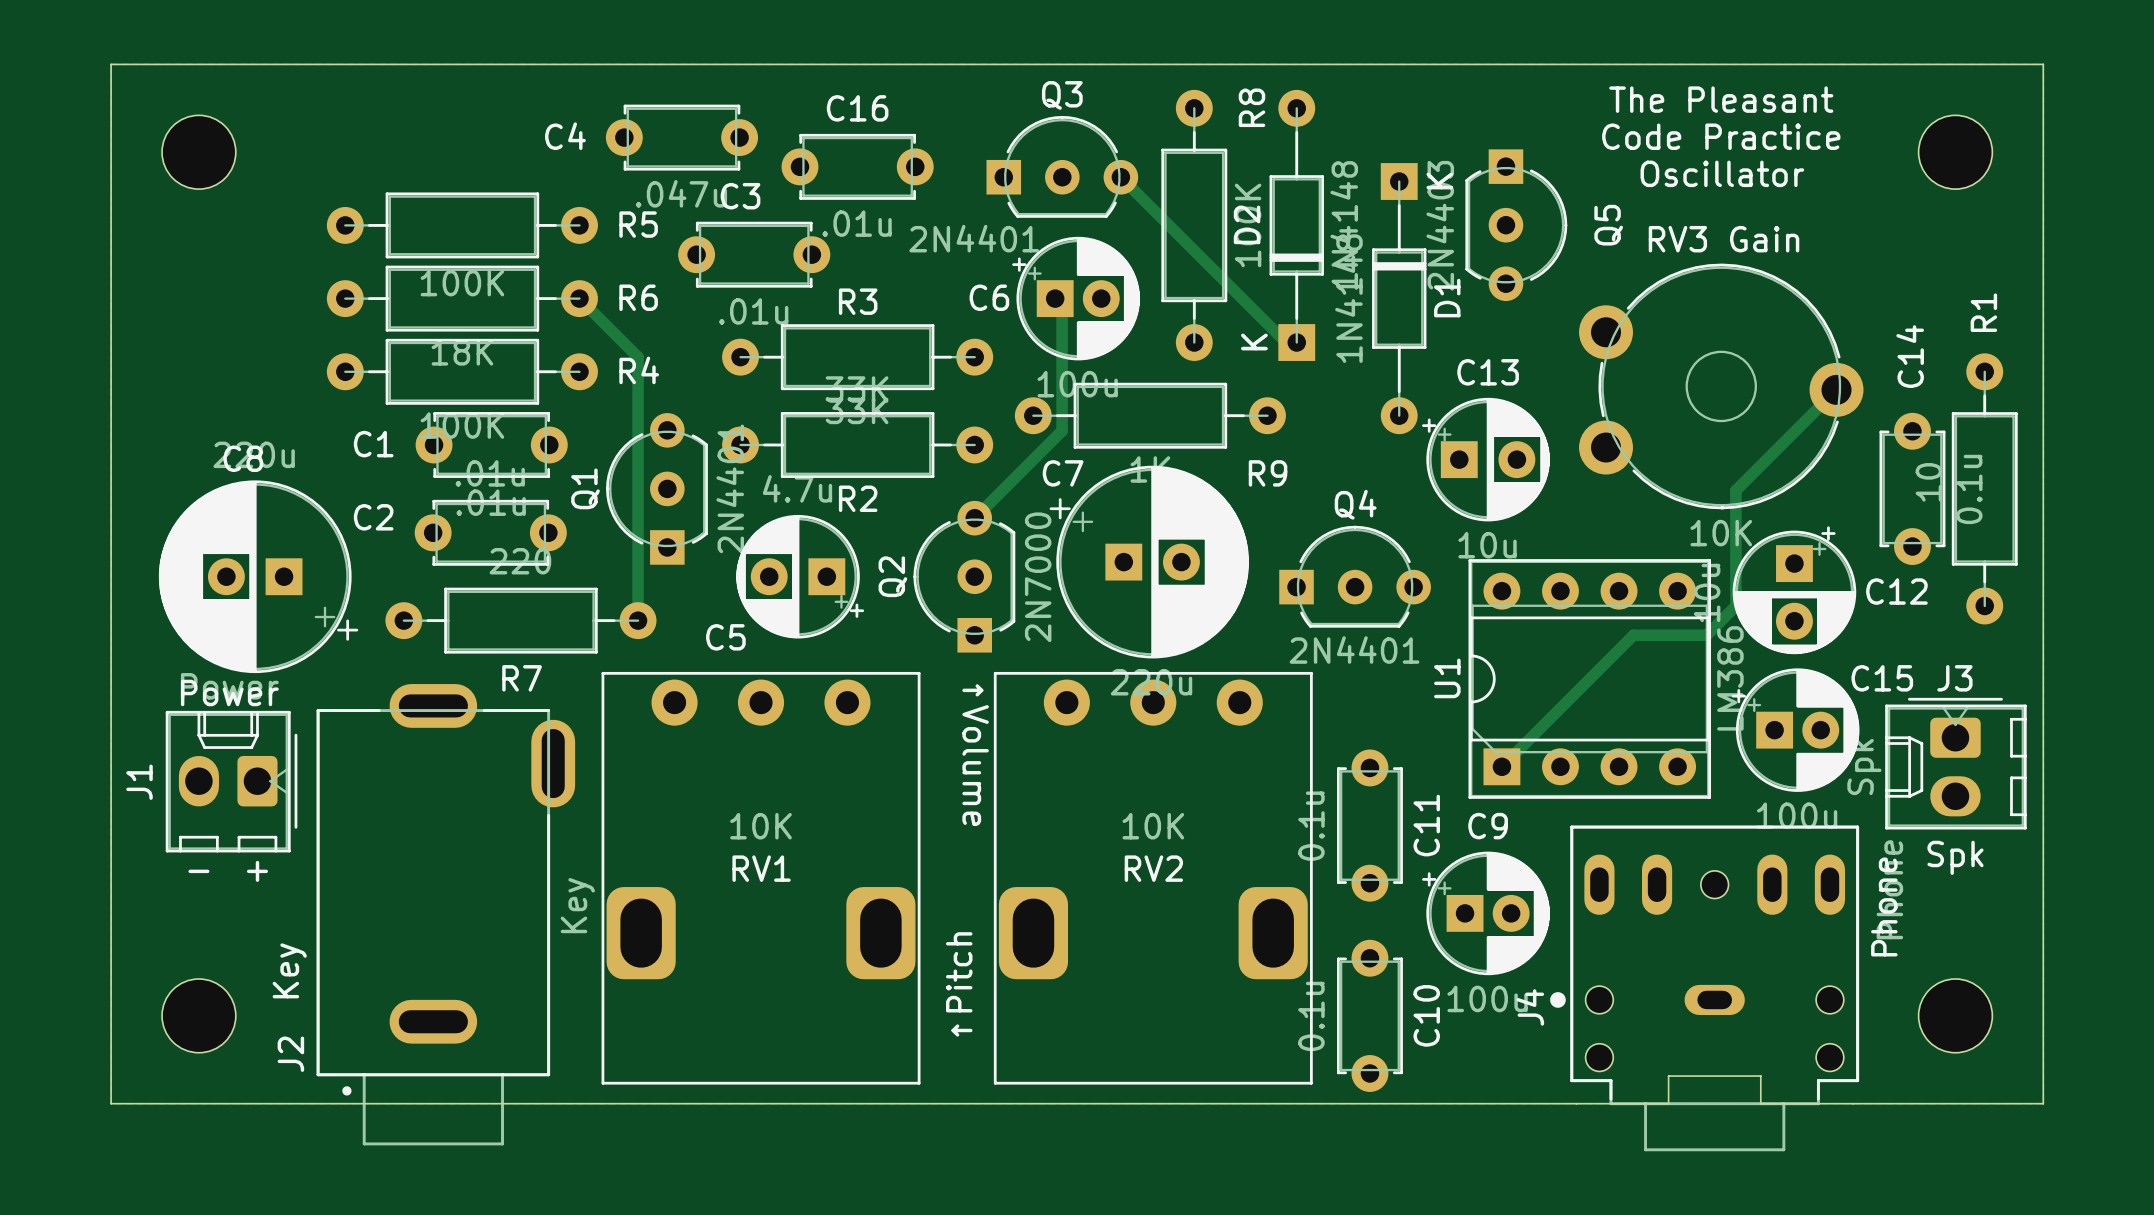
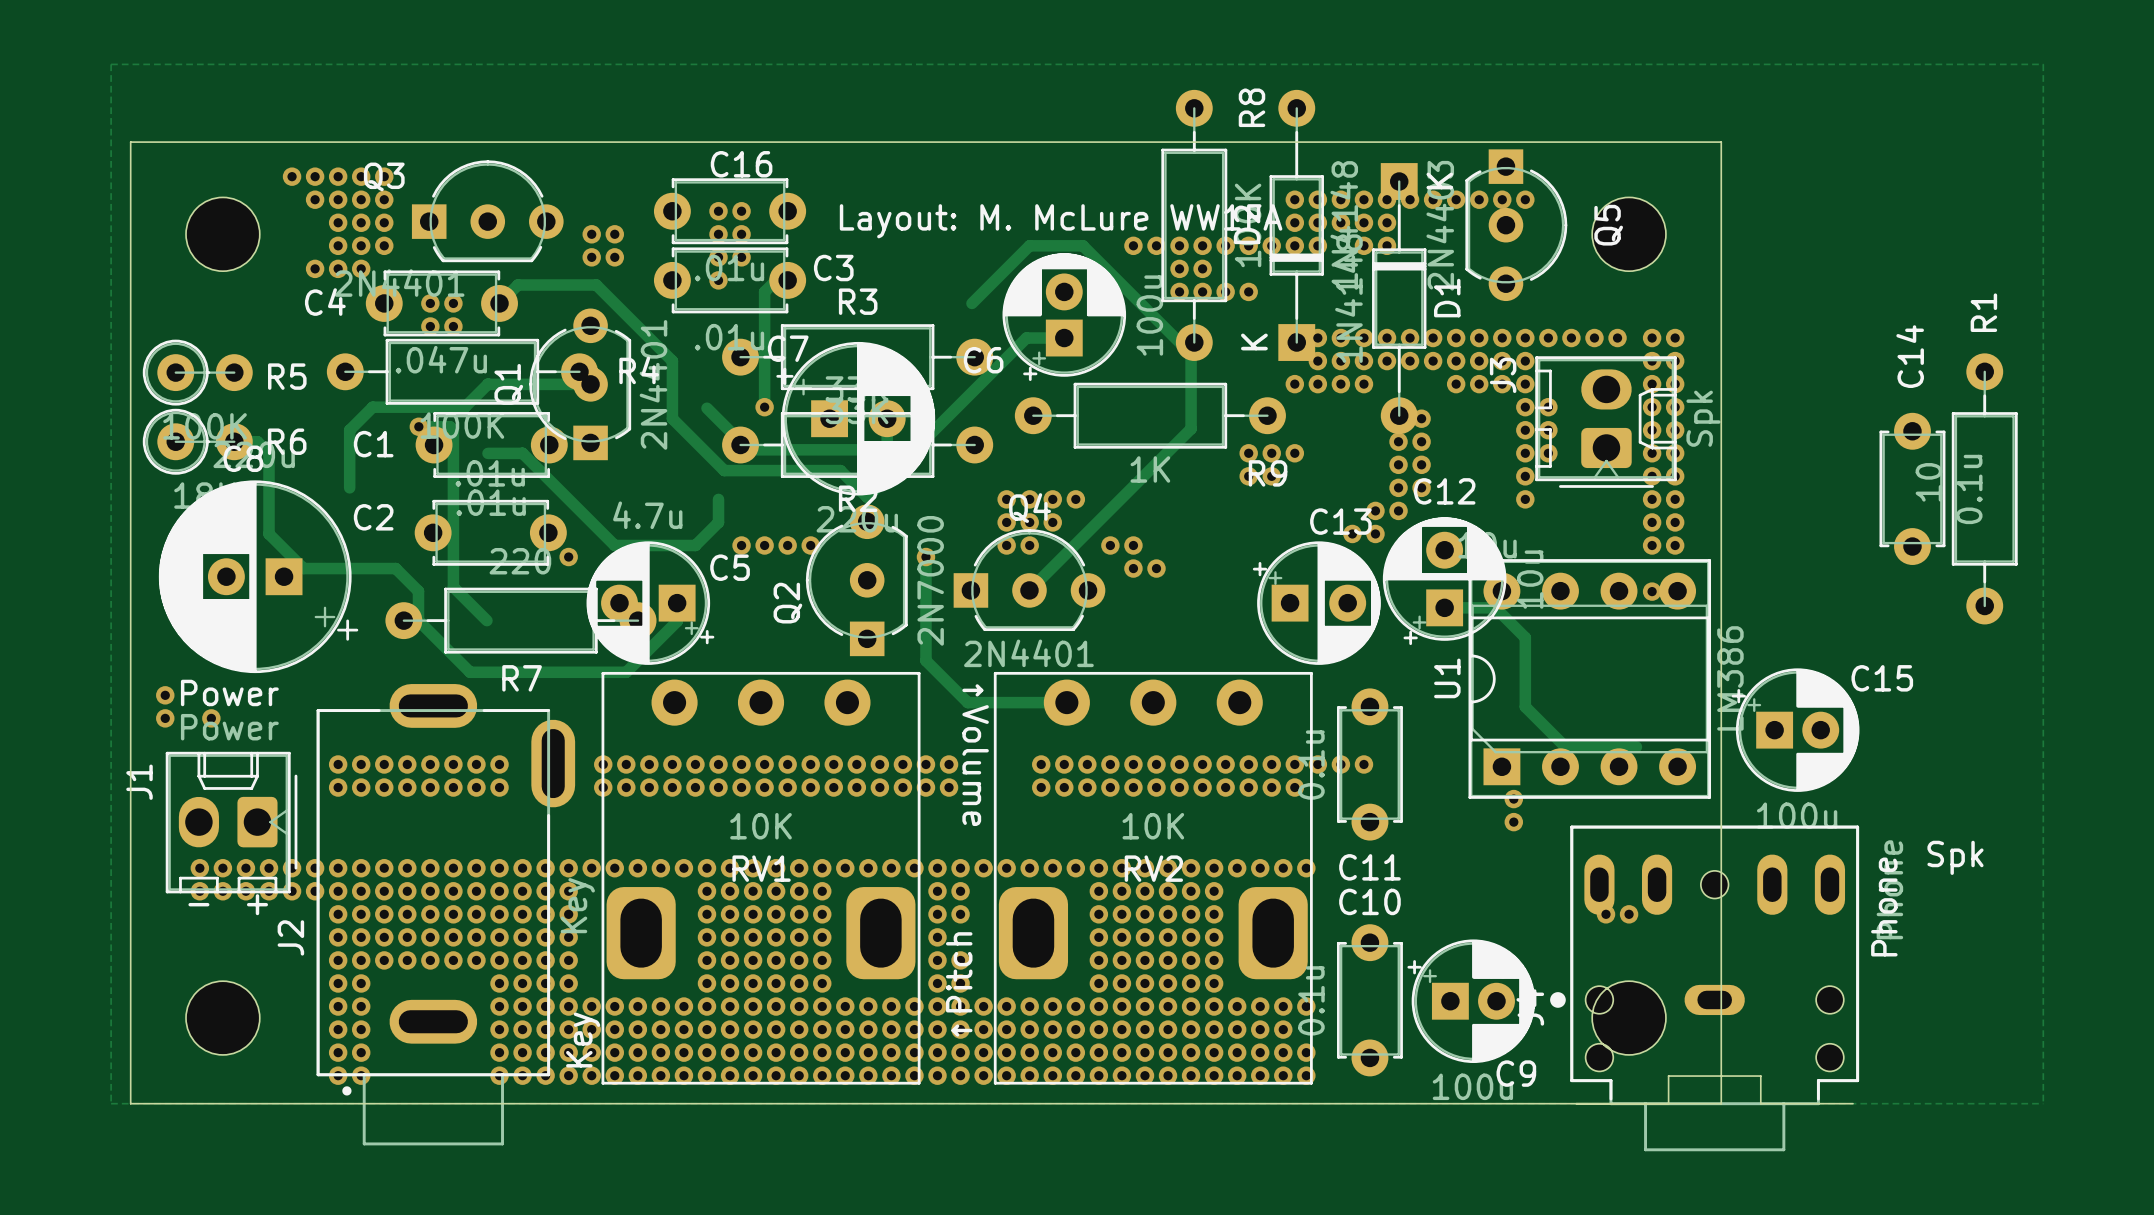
Q3 name position: Q3 (1062, 95) -> Q3 (384, 176)
text: The Pleasant (1721, 99) -> none
C16 name position: C16 (857, 108) -> C16 (741, 164)
text: Code Practice (1721, 136) -> none
C4 position: (681, 137) -> (441, 303)
part position: (198, 152) -> (222, 234)
part position: (1955, 152) -> (1629, 234)
C16 position: (857, 166) -> (730, 211)
Q3 position: (1062, 166) -> (487, 211)
text: Oscillator (1722, 173) -> none
via: none -> (292, 176)
via: none -> (315, 176)
via: none -> (338, 176)
via: none -> (361, 176)
via: none -> (384, 176)
track: (1120, 177) (1286, 342) (1296, 342) -> none
R5 footprint: [326, 192, 598, 259] -> [142, 339, 253, 406]
C3 name position: C3 (740, 196) -> C3 (833, 268)
via: none -> (315, 199)
via: none -> (338, 199)
via: none -> (361, 199)
via: none -> (384, 199)
via: none -> (1294, 199)
via: none -> (1317, 199)
via: none -> (1340, 199)
via: none -> (1363, 199)
via: none -> (1387, 199)
via: none -> (1410, 199)
via: none -> (1433, 199)
via: none -> (1456, 199)
via: none -> (1479, 199)
via: none -> (1502, 199)
via: none -> (1525, 199)
via: none -> (718, 211)
via: none -> (741, 211)
text: none -> Layout: M. McLure WW1FA (1061, 221)
via: none -> (338, 222)
via: none -> (361, 222)
via: none -> (384, 222)
via: none -> (1294, 222)
via: none -> (1317, 222)
via: none -> (1340, 222)
via: none -> (1363, 222)
via: none -> (1387, 222)
R5 name position: R5 (638, 224) -> R5 (287, 376)
via: none -> (591, 234)
via: none -> (614, 234)
via: none -> (718, 234)
via: none -> (741, 234)
text: Gain (1764, 239) -> none
via: none -> (338, 245)
via: none -> (361, 245)
via: none -> (384, 245)
via: none -> (1133, 245)
via: none -> (1156, 245)
via: none -> (1179, 245)
via: none -> (1202, 245)
via: none -> (1225, 245)
via: none -> (1248, 245)
via: none -> (1271, 245)
via: none -> (1294, 245)
via: none -> (1317, 245)
via: none -> (1363, 245)
via: none -> (1387, 245)
C3 position: (754, 254) -> (730, 280)
via: none -> (591, 257)
via: none -> (614, 257)
via: none -> (718, 257)
via: none -> (741, 257)
R6 footprint: [326, 265, 598, 332] -> [142, 408, 253, 475]
via: none -> (315, 268)
via: none -> (338, 268)
via: none -> (361, 268)
via: none -> (1179, 268)
via: none -> (1202, 268)
via: none -> (718, 280)
track: none -> (776, 280) (764, 291) (764, 407)
via: none -> (1179, 291)
via: none -> (1202, 291)
via: none -> (1225, 291)
via: none -> (1248, 291)
R6 name position: R6 (638, 297) -> R6 (287, 441)
track: (579, 298) (638, 357) (638, 620) -> none
track: (1055, 298) (1062, 305) (1062, 430) (974, 518) -> none
C6 rotation: 0° (1076, 298) -> 90° counterclockwise (1064, 317)
via: none -> (430, 303)
via: none -> (453, 303)
track: none -> (499, 303) (517, 285) (596, 285) (672, 361) (672, 418) (724, 470) (840, 470) (867, 497) (1026, 338) (1064, 338)
track: none -> (971, 303) (1029, 245) (1082, 245) (1191, 353) (1191, 428) (1029, 590)
via: none -> (430, 326)
via: none -> (453, 326)
via: none -> (1317, 338)
via: none -> (1340, 338)
via: none -> (1363, 338)
via: none -> (1387, 338)
via: none -> (1410, 338)
via: none -> (1433, 338)
via: none -> (1456, 338)
via: none -> (1479, 338)
via: none -> (1502, 338)
via: none -> (1525, 338)
via: none -> (1548, 338)
via: none -> (1571, 338)
via: none -> (1594, 338)
via: none -> (1617, 338)
via: none -> (1652, 338)
via: none -> (1675, 338)
via: none -> (1317, 361)
via: none -> (1340, 361)
via: none -> (1363, 361)
via: none -> (1387, 361)
via: none -> (1410, 361)
via: none -> (1433, 361)
via: none -> (1456, 361)
via: none -> (1479, 361)
via: none -> (1502, 361)
via: none -> (1525, 361)
via: none -> (1652, 361)
via: none -> (1675, 361)
C13 name position: C13 (1488, 372) -> C13 (1340, 521)
track: none -> (487, 384) (464, 407) (372, 407) (349, 430) (349, 487)
track: none -> (488, 384) (590, 384)
via: none -> (1294, 384)
via: none -> (1317, 384)
via: none -> (1340, 384)
via: none -> (1363, 384)
via: none -> (1456, 384)
via: none -> (1479, 384)
via: none -> (1502, 384)
via: none -> (1525, 384)
via: none -> (1652, 384)
via: none -> (1675, 384)
RV3: 10K (1721, 386) -> none
track: (1836, 389) (1735, 490) (1735, 606) (1706, 635) (1633, 635) (1501, 766) -> none
via: none -> (764, 407)
via: none -> (1525, 407)
via: none -> (1548, 407)
via: none -> (1652, 407)
via: none -> (1675, 407)
track: none -> (706, 408) (748, 449) (883, 449) (887, 445) (887, 418)
via: none -> (1421, 418)
track: none -> (418, 426) (449, 426) (453, 430) (453, 587) (486, 620)
via: none -> (418, 426)
via: none -> (1525, 430)
via: none -> (1548, 430)
via: none -> (1652, 430)
via: none -> (1675, 430)
track: none -> (234, 441) (257, 441) (269, 453) (269, 533) (303, 568) (395, 568) (418, 591) (418, 620) (470, 672) (626, 672) (677, 621) (677, 603)
via: none -> (1398, 441)
via: none -> (1421, 441)
track: none -> (487, 453) (522, 453) (614, 545) (695, 545) (718, 522) (718, 499)
via: none -> (1248, 453)
via: none -> (1271, 453)
via: none -> (1294, 453)
via: none -> (1525, 453)
via: none -> (1548, 453)
via: none -> (1652, 453)
via: none -> (1675, 453)
C13 position: (1485, 459) -> (1316, 603)
via: none -> (1398, 464)
via: none -> (1421, 464)
C7 footprint: [1049, 465, 1249, 659] -> [776, 341, 936, 496]
via: none -> (1248, 476)
via: none -> (1271, 476)
via: none -> (1525, 476)
via: none -> (1652, 476)
via: none -> (1675, 476)
via: none -> (1398, 487)
via: none -> (1421, 487)
Q1 position: (656, 488) -> (580, 384)
via: none -> (1006, 499)
via: none -> (1029, 499)
via: none -> (1052, 499)
via: none -> (1075, 499)
via: none -> (1525, 499)
via: none -> (1652, 499)
via: none -> (1675, 499)
via: none -> (1375, 510)
via: none -> (1398, 510)
via: none -> (1006, 522)
via: none -> (1029, 522)
via: none -> (1052, 522)
via: none -> (1652, 522)
via: none -> (1675, 522)
via: none -> (1352, 533)
via: none -> (1375, 533)
via: none -> (741, 545)
via: none -> (764, 545)
via: none -> (787, 545)
via: none -> (810, 545)
via: none -> (1006, 545)
via: none -> (1029, 545)
via: none -> (1110, 545)
via: none -> (1133, 545)
via: none -> (1652, 545)
via: none -> (1675, 545)
via: none -> (568, 557)
track: none -> (925, 557) (925, 660) (967, 702) (1066, 702)
via: none -> (925, 557)
via: none -> (1133, 568)
via: none -> (1156, 568)
C5 position: (800, 576) -> (650, 603)
Q2 name position: Q2 (892, 576) -> Q2 (787, 603)
Q2 position: (964, 576) -> (856, 580)
Q4 position: (1355, 576) -> (1029, 580)
C12 rotation: 0° (1794, 590) -> 180° (1444, 581)
C12 position: (1794, 590) -> (1444, 581)
via: none -> (1652, 591)
C12 name position: C12 (1896, 591) -> C12 (1444, 491)
track: none -> (1444, 607) (1495, 607) (1525, 637) (1525, 706) (1565, 746) (1636, 746)
C5 name position: C5 (725, 637) -> C5 (730, 567)
J3 name position: J3 (1954, 678) -> J3 (1503, 375)
via: none -> (165, 695)
via: none -> (165, 718)
via: none -> (211, 718)
J3 rotation: 0° (1955, 763) -> 180° (1606, 422)
J3 position: (1955, 763) -> (1606, 422)
via: none -> (338, 764)
via: none -> (361, 764)
via: none -> (384, 764)
via: none -> (407, 764)
via: none -> (430, 764)
via: none -> (453, 764)
via: none -> (476, 764)
via: none -> (499, 764)
via: none -> (603, 764)
via: none -> (626, 764)
via: none -> (649, 764)
via: none -> (672, 764)
via: none -> (695, 764)
via: none -> (718, 764)
via: none -> (741, 764)
via: none -> (764, 764)
via: none -> (787, 764)
via: none -> (810, 764)
via: none -> (833, 764)
via: none -> (856, 764)
via: none -> (879, 764)
via: none -> (902, 764)
via: none -> (925, 764)
via: none -> (949, 764)
via: none -> (1041, 764)
via: none -> (1064, 764)
via: none -> (1087, 764)
via: none -> (1110, 764)
via: none -> (1133, 764)
via: none -> (1156, 764)
via: none -> (1179, 764)
via: none -> (1202, 764)
via: none -> (1225, 764)
via: none -> (1248, 764)
via: none -> (1271, 764)
via: none -> (1294, 764)
via: none -> (1317, 764)
via: none -> (1340, 764)
via: none -> (1363, 764)
J1 position: (231, 781) -> (231, 822)
via: none -> (338, 787)
via: none -> (361, 787)
via: none -> (384, 787)
via: none -> (407, 787)
via: none -> (430, 787)
via: none -> (453, 787)
via: none -> (476, 787)
via: none -> (499, 787)
via: none -> (603, 787)
via: none -> (626, 787)
via: none -> (649, 787)
via: none -> (672, 787)
via: none -> (695, 787)
via: none -> (718, 787)
via: none -> (741, 787)
via: none -> (764, 787)
via: none -> (787, 787)
via: none -> (810, 787)
via: none -> (833, 787)
via: none -> (856, 787)
via: none -> (879, 787)
via: none -> (902, 787)
via: none -> (925, 787)
via: none -> (949, 787)
via: none -> (1041, 787)
via: none -> (1064, 787)
via: none -> (1087, 787)
via: none -> (1110, 787)
via: none -> (1133, 787)
via: none -> (1156, 787)
via: none -> (1179, 787)
via: none -> (1202, 787)
via: none -> (1225, 787)
via: none -> (1248, 787)
via: none -> (1271, 787)
via: none -> (1294, 787)
via: none -> (1513, 799)
via: none -> (1513, 822)
C11 position: (1369, 825) -> (1369, 764)
C11 name rotation: 0° (1426, 825) -> 90° clockwise (1369, 867)
C9 name position: C9 (1488, 826) -> C9 (1516, 1073)
via: none -> (199, 868)
via: none -> (222, 868)
via: none -> (245, 868)
via: none -> (269, 868)
via: none -> (292, 868)
via: none -> (315, 868)
via: none -> (338, 868)
via: none -> (361, 868)
via: none -> (384, 868)
via: none -> (407, 868)
via: none -> (430, 868)
via: none -> (453, 868)
via: none -> (476, 868)
via: none -> (499, 868)
via: none -> (522, 868)
via: none -> (545, 868)
via: none -> (568, 868)
via: none -> (591, 868)
via: none -> (614, 868)
via: none -> (637, 868)
via: none -> (660, 868)
via: none -> (683, 868)
via: none -> (706, 868)
via: none -> (730, 868)
via: none -> (753, 868)
via: none -> (776, 868)
via: none -> (799, 868)
via: none -> (822, 868)
via: none -> (845, 868)
via: none -> (868, 868)
via: none -> (891, 868)
via: none -> (914, 868)
via: none -> (937, 868)
via: none -> (960, 868)
via: none -> (983, 868)
via: none -> (1006, 868)
via: none -> (1029, 868)
via: none -> (1052, 868)
via: none -> (1075, 868)
via: none -> (1098, 868)
via: none -> (1121, 868)
via: none -> (1144, 868)
via: none -> (1168, 868)
via: none -> (1191, 868)
via: none -> (1214, 868)
via: none -> (1237, 868)
via: none -> (1260, 868)
via: none -> (1283, 868)
via: none -> (1306, 868)
text position: - (198, 871) -> - (198, 904)
text position: + (257, 871) -> + (257, 904)
via: none -> (199, 891)
via: none -> (222, 891)
via: none -> (245, 891)
via: none -> (269, 891)
via: none -> (292, 891)
via: none -> (315, 891)
via: none -> (338, 891)
via: none -> (361, 891)
via: none -> (384, 891)
via: none -> (407, 891)
via: none -> (430, 891)
via: none -> (453, 891)
via: none -> (476, 891)
via: none -> (499, 891)
via: none -> (522, 891)
via: none -> (545, 891)
via: none -> (568, 891)
via: none -> (706, 891)
via: none -> (730, 891)
via: none -> (753, 891)
via: none -> (776, 891)
via: none -> (799, 891)
via: none -> (822, 891)
via: none -> (937, 891)
via: none -> (960, 891)
via: none -> (1098, 891)
via: none -> (1121, 891)
via: none -> (1144, 891)
via: none -> (1168, 891)
via: none -> (1191, 891)
via: none -> (1214, 891)
C9 position: (1485, 913) -> (1471, 1001)
via: none -> (338, 914)
via: none -> (361, 914)
via: none -> (384, 914)
via: none -> (407, 914)
via: none -> (430, 914)
via: none -> (453, 914)
via: none -> (476, 914)
via: none -> (499, 914)
via: none -> (522, 914)
via: none -> (545, 914)
via: none -> (568, 914)
via: none -> (706, 914)
via: none -> (730, 914)
via: none -> (753, 914)
via: none -> (776, 914)
via: none -> (799, 914)
via: none -> (822, 914)
via: none -> (937, 914)
via: none -> (960, 914)
via: none -> (1098, 914)
via: none -> (1121, 914)
via: none -> (1144, 914)
via: none -> (1168, 914)
via: none -> (1191, 914)
via: none -> (1214, 914)
via: none -> (1606, 914)
via: none -> (1629, 914)
via: none -> (338, 937)
via: none -> (361, 937)
via: none -> (384, 937)
via: none -> (407, 937)
via: none -> (430, 937)
via: none -> (453, 937)
via: none -> (476, 937)
via: none -> (499, 937)
via: none -> (522, 937)
via: none -> (545, 937)
via: none -> (568, 937)
via: none -> (706, 937)
via: none -> (730, 937)
via: none -> (753, 937)
via: none -> (776, 937)
via: none -> (799, 937)
via: none -> (822, 937)
via: none -> (937, 937)
via: none -> (1098, 937)
via: none -> (1121, 937)
via: none -> (1144, 937)
via: none -> (1168, 937)
via: none -> (1191, 937)
via: none -> (1214, 937)
via: none -> (338, 960)
via: none -> (361, 960)
via: none -> (384, 960)
via: none -> (407, 960)
via: none -> (430, 960)
via: none -> (453, 960)
via: none -> (476, 960)
via: none -> (499, 960)
via: none -> (522, 960)
via: none -> (545, 960)
via: none -> (568, 960)
via: none -> (706, 960)
via: none -> (730, 960)
via: none -> (753, 960)
via: none -> (776, 960)
via: none -> (799, 960)
via: none -> (822, 960)
via: none -> (937, 960)
via: none -> (960, 960)
via: none -> (1098, 960)
via: none -> (1121, 960)
via: none -> (1144, 960)
via: none -> (1168, 960)
via: none -> (1191, 960)
via: none -> (1214, 960)
text position: Key (289, 970) -> Key (583, 1040)
via: none -> (338, 983)
via: none -> (361, 983)
via: none -> (499, 983)
via: none -> (522, 983)
via: none -> (545, 983)
via: none -> (568, 983)
via: none -> (706, 983)
via: none -> (730, 983)
via: none -> (753, 983)
via: none -> (776, 983)
via: none -> (799, 983)
via: none -> (822, 983)
via: none -> (937, 983)
via: none -> (960, 983)
via: none -> (1098, 983)
via: none -> (1121, 983)
via: none -> (1144, 983)
via: none -> (1168, 983)
via: none -> (1191, 983)
via: none -> (1214, 983)
via: none -> (338, 1006)
via: none -> (361, 1006)
via: none -> (499, 1006)
via: none -> (522, 1006)
via: none -> (545, 1006)
via: none -> (568, 1006)
via: none -> (591, 1006)
via: none -> (614, 1006)
via: none -> (637, 1006)
via: none -> (660, 1006)
via: none -> (683, 1006)
via: none -> (706, 1006)
via: none -> (730, 1006)
via: none -> (753, 1006)
via: none -> (776, 1006)
via: none -> (799, 1006)
via: none -> (822, 1006)
via: none -> (845, 1006)
via: none -> (868, 1006)
via: none -> (891, 1006)
via: none -> (914, 1006)
via: none -> (937, 1006)
via: none -> (960, 1006)
via: none -> (983, 1006)
via: none -> (1006, 1006)
via: none -> (1029, 1006)
via: none -> (1052, 1006)
via: none -> (1075, 1006)
via: none -> (1098, 1006)
via: none -> (1121, 1006)
via: none -> (1144, 1006)
via: none -> (1168, 1006)
via: none -> (1191, 1006)
via: none -> (1214, 1006)
via: none -> (1237, 1006)
via: none -> (1260, 1006)
via: none -> (1283, 1006)
via: none -> (1306, 1006)
part position: (198, 1015) -> (222, 1018)
C10 position: (1369, 1015) -> (1369, 1000)
C10 name rotation: 0° (1426, 1015) -> 90° clockwise (1369, 901)
C10 name position: C10 (1426, 1015) -> C10 (1369, 901)
part position: (1955, 1015) -> (1629, 1018)
via: none -> (338, 1029)
via: none -> (361, 1029)
via: none -> (499, 1029)
via: none -> (522, 1029)
via: none -> (545, 1029)
via: none -> (568, 1029)
via: none -> (591, 1029)
via: none -> (614, 1029)
via: none -> (637, 1029)
via: none -> (660, 1029)
via: none -> (683, 1029)
via: none -> (706, 1029)
via: none -> (730, 1029)
via: none -> (753, 1029)
via: none -> (776, 1029)
via: none -> (799, 1029)
via: none -> (822, 1029)
via: none -> (845, 1029)
via: none -> (868, 1029)
via: none -> (891, 1029)
via: none -> (914, 1029)
via: none -> (937, 1029)
via: none -> (960, 1029)
via: none -> (983, 1029)
via: none -> (1006, 1029)
via: none -> (1029, 1029)
via: none -> (1052, 1029)
via: none -> (1075, 1029)
via: none -> (1098, 1029)
via: none -> (1121, 1029)
via: none -> (1144, 1029)
via: none -> (1168, 1029)
via: none -> (1191, 1029)
via: none -> (1214, 1029)
via: none -> (1237, 1029)
via: none -> (1260, 1029)
via: none -> (1283, 1029)
via: none -> (338, 1052)
via: none -> (361, 1052)
via: none -> (499, 1052)
via: none -> (522, 1052)
via: none -> (545, 1052)
via: none -> (568, 1052)
via: none -> (591, 1052)
via: none -> (614, 1052)
via: none -> (637, 1052)
via: none -> (660, 1052)
via: none -> (683, 1052)
via: none -> (706, 1052)
via: none -> (730, 1052)
via: none -> (753, 1052)
via: none -> (776, 1052)
via: none -> (799, 1052)
via: none -> (822, 1052)
via: none -> (845, 1052)
via: none -> (868, 1052)
via: none -> (891, 1052)
via: none -> (914, 1052)
via: none -> (937, 1052)
via: none -> (960, 1052)
via: none -> (983, 1052)
via: none -> (1006, 1052)
via: none -> (1029, 1052)
via: none -> (1052, 1052)
via: none -> (1075, 1052)
via: none -> (1098, 1052)
via: none -> (1121, 1052)
via: none -> (1144, 1052)
via: none -> (1168, 1052)
via: none -> (1191, 1052)
via: none -> (1214, 1052)
via: none -> (1237, 1052)
via: none -> (1260, 1052)
via: none -> (1283, 1052)
via: none -> (1306, 1052)
J2 name position: J2 (290, 1054) -> J2 (290, 937)
via: none -> (338, 1075)
via: none -> (361, 1075)
via: none -> (499, 1075)
via: none -> (522, 1075)
via: none -> (545, 1075)
via: none -> (568, 1075)
via: none -> (591, 1075)
via: none -> (614, 1075)
via: none -> (637, 1075)
via: none -> (660, 1075)
via: none -> (683, 1075)
via: none -> (706, 1075)
via: none -> (730, 1075)
via: none -> (753, 1075)
via: none -> (776, 1075)
via: none -> (799, 1075)
via: none -> (822, 1075)
via: none -> (845, 1075)
via: none -> (868, 1075)
via: none -> (891, 1075)
via: none -> (914, 1075)
via: none -> (937, 1075)
via: none -> (960, 1075)
via: none -> (983, 1075)
via: none -> (1006, 1075)
via: none -> (1029, 1075)
via: none -> (1052, 1075)
via: none -> (1075, 1075)
via: none -> (1098, 1075)
via: none -> (1121, 1075)
via: none -> (1144, 1075)
via: none -> (1168, 1075)
via: none -> (1191, 1075)
via: none -> (1214, 1075)
via: none -> (1237, 1075)
via: none -> (1260, 1075)
via: none -> (1283, 1075)
via: none -> (1306, 1075)
board edge: (130, 1103) (111, 1103) (111, 64) (2043, 64) (2043, 1103) (1853, 1103) -> (130, 1103) (130, 142) (1721, 142) (1721, 1103) (1576, 1103)

